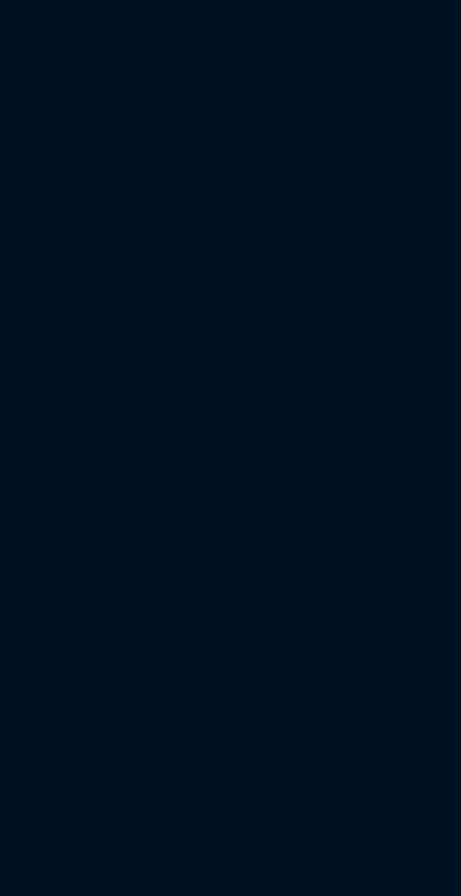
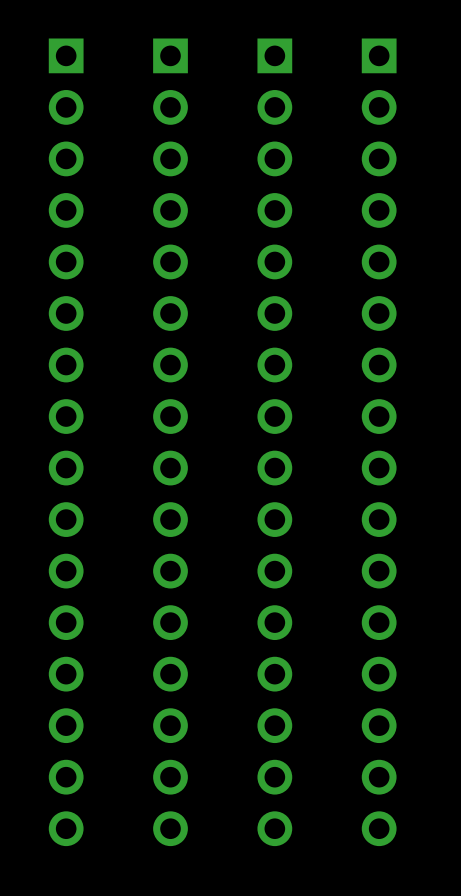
part: none -> (66, 442)
part: none -> (170, 442)
part: none -> (274, 442)
part: none -> (379, 442)

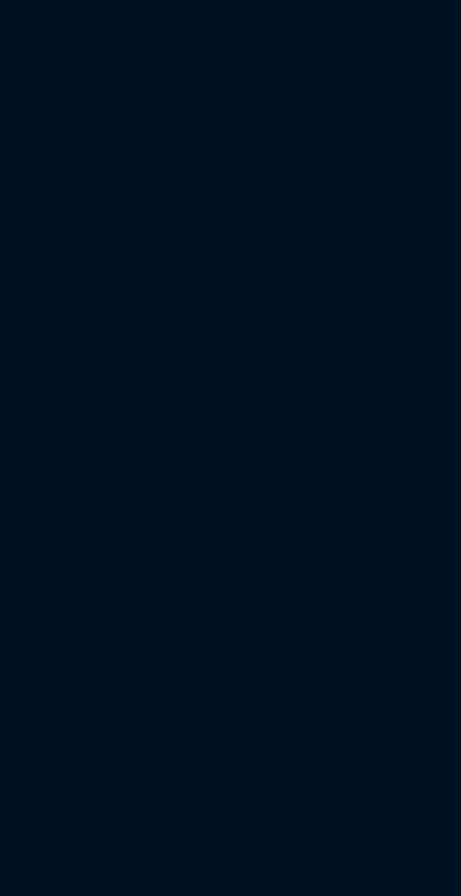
part: (66, 442) -> none
part: (170, 442) -> none
part: (274, 442) -> none
part: (379, 442) -> none

